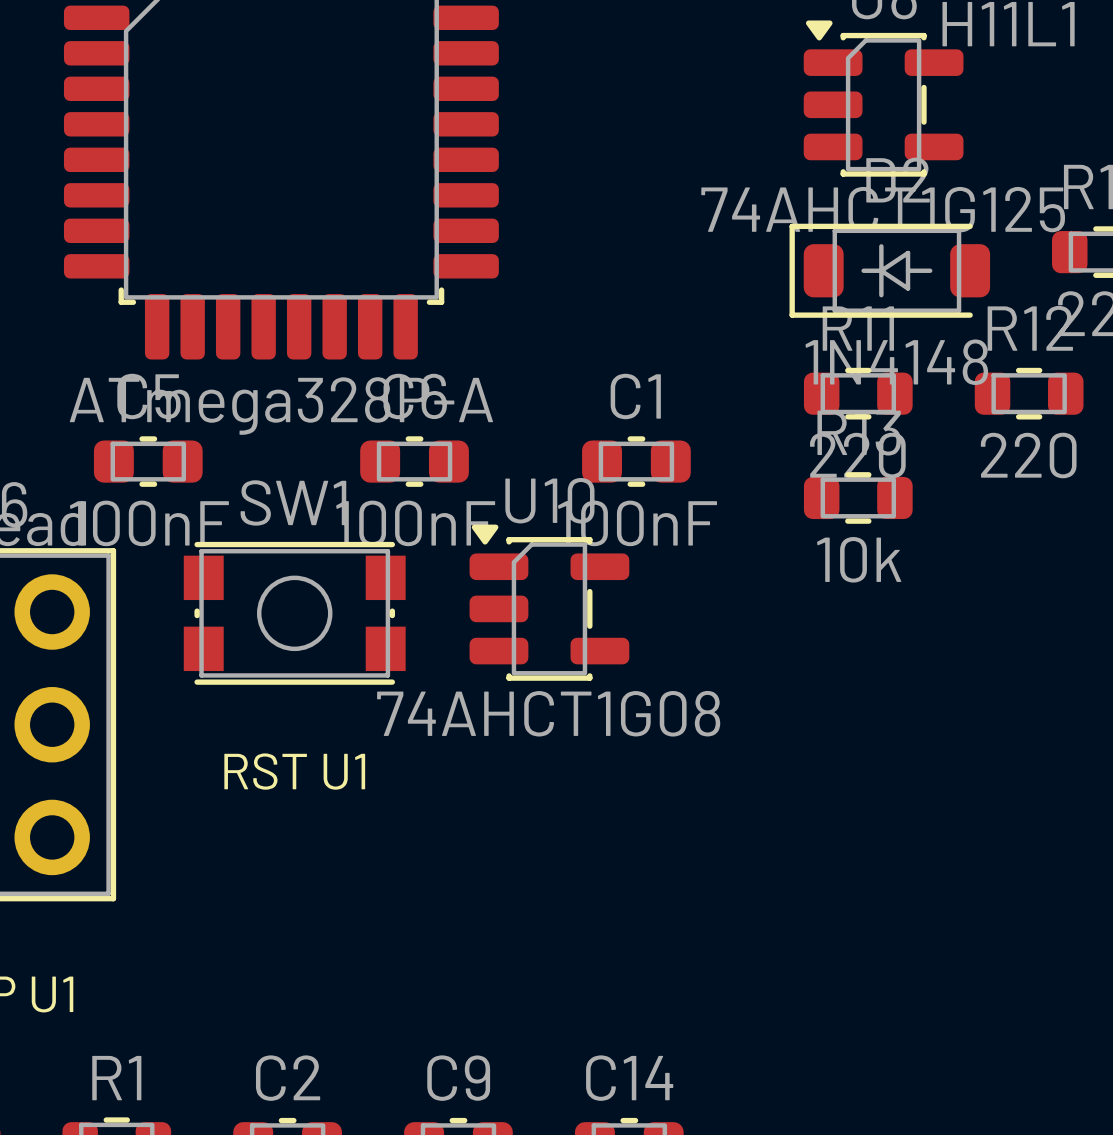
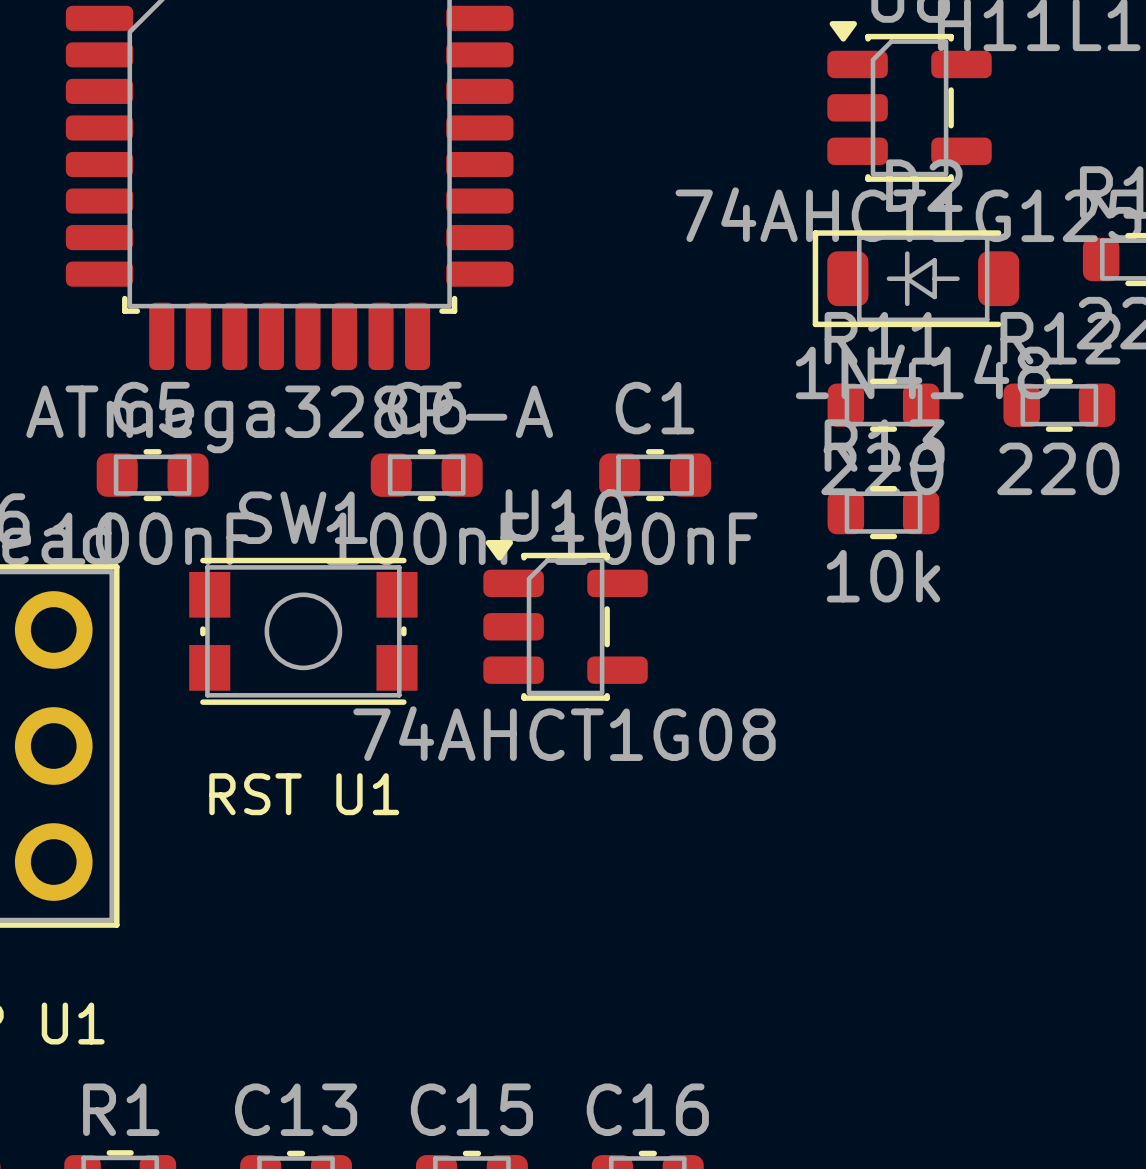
C2 name: C2 (288, 1078) -> C13 (296, 1109)
C9 name: C9 (458, 1078) -> C15 (471, 1109)
C14 name: C14 (629, 1078) -> C16 (647, 1109)

